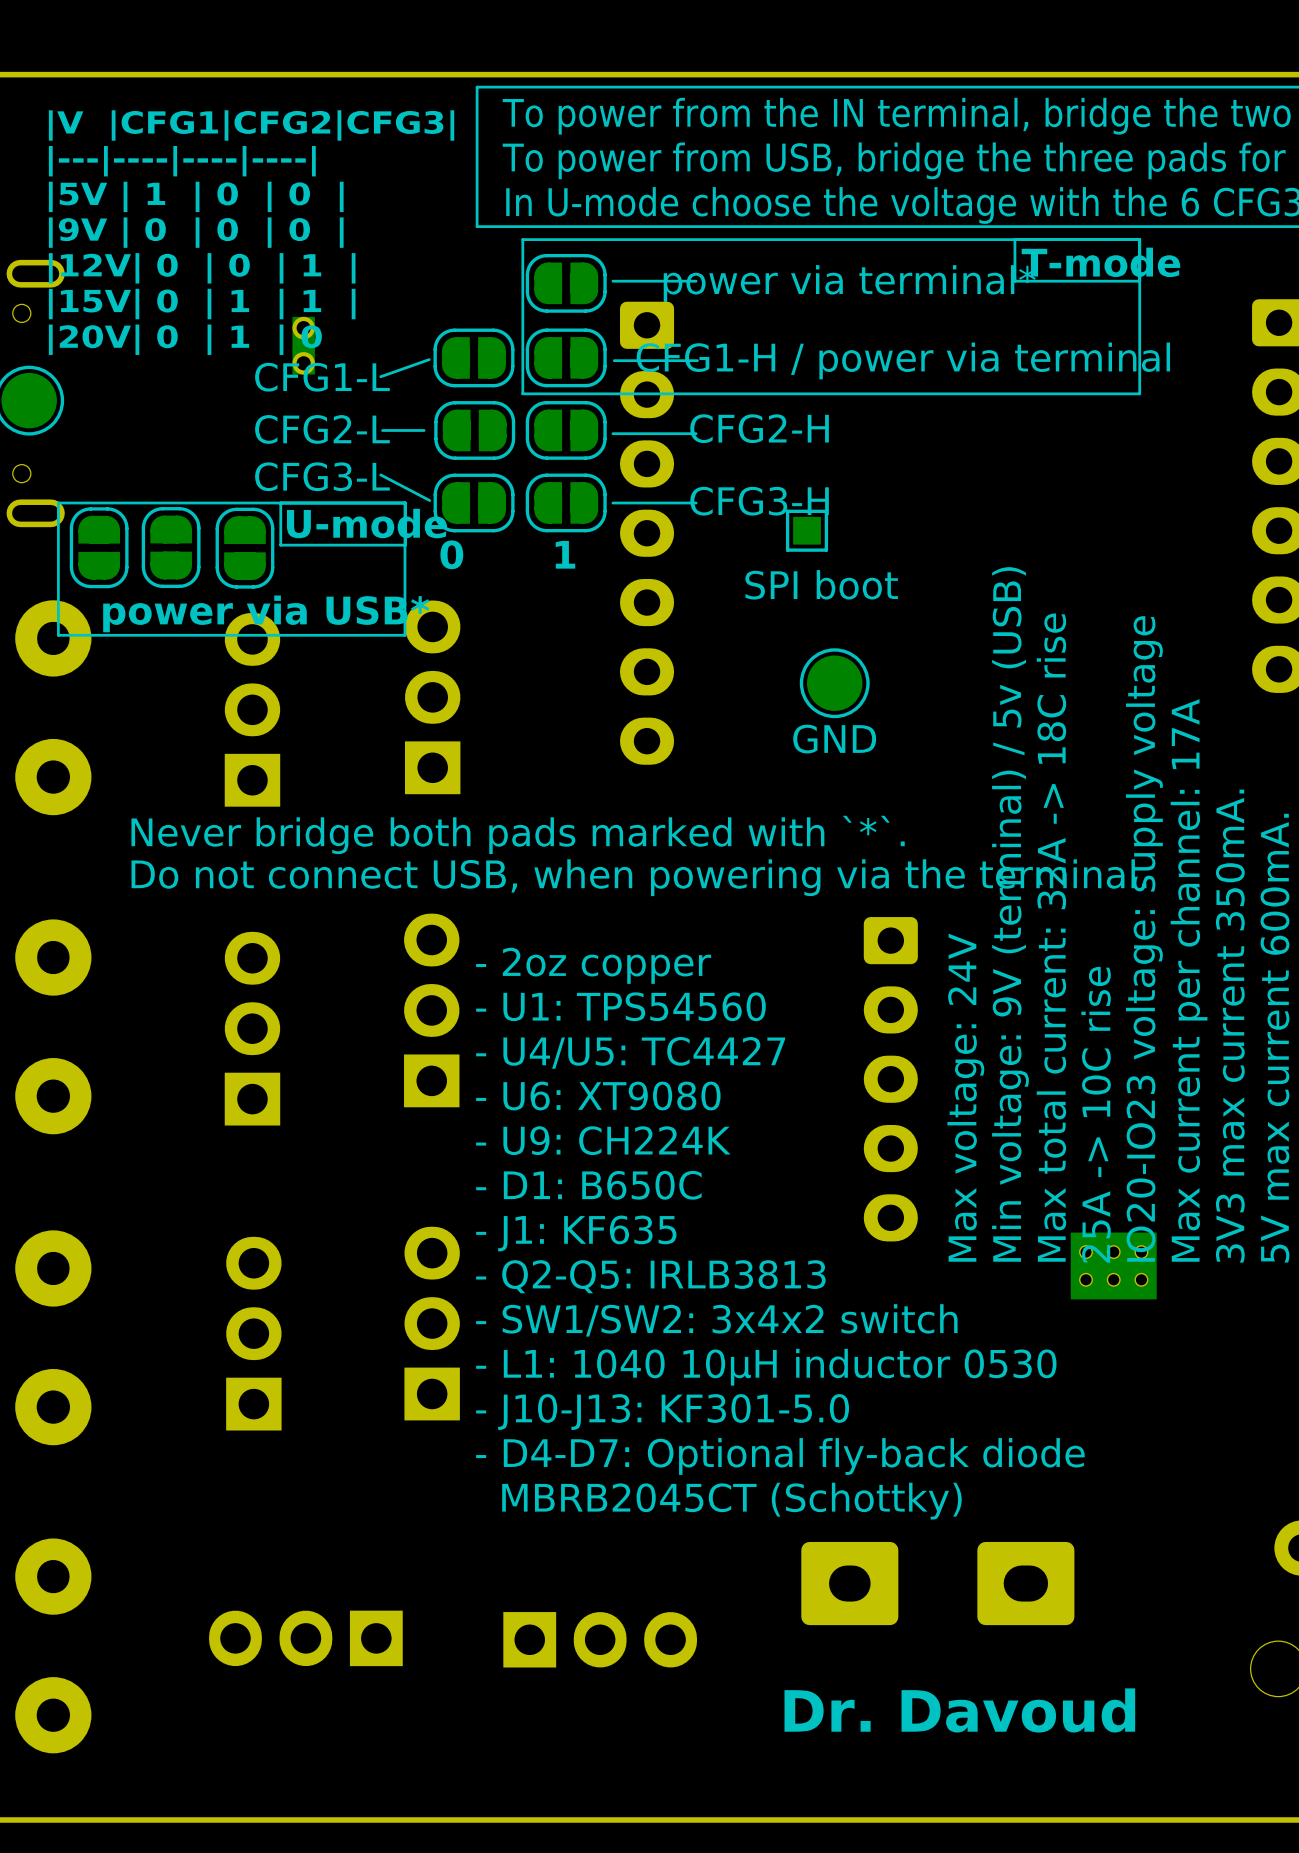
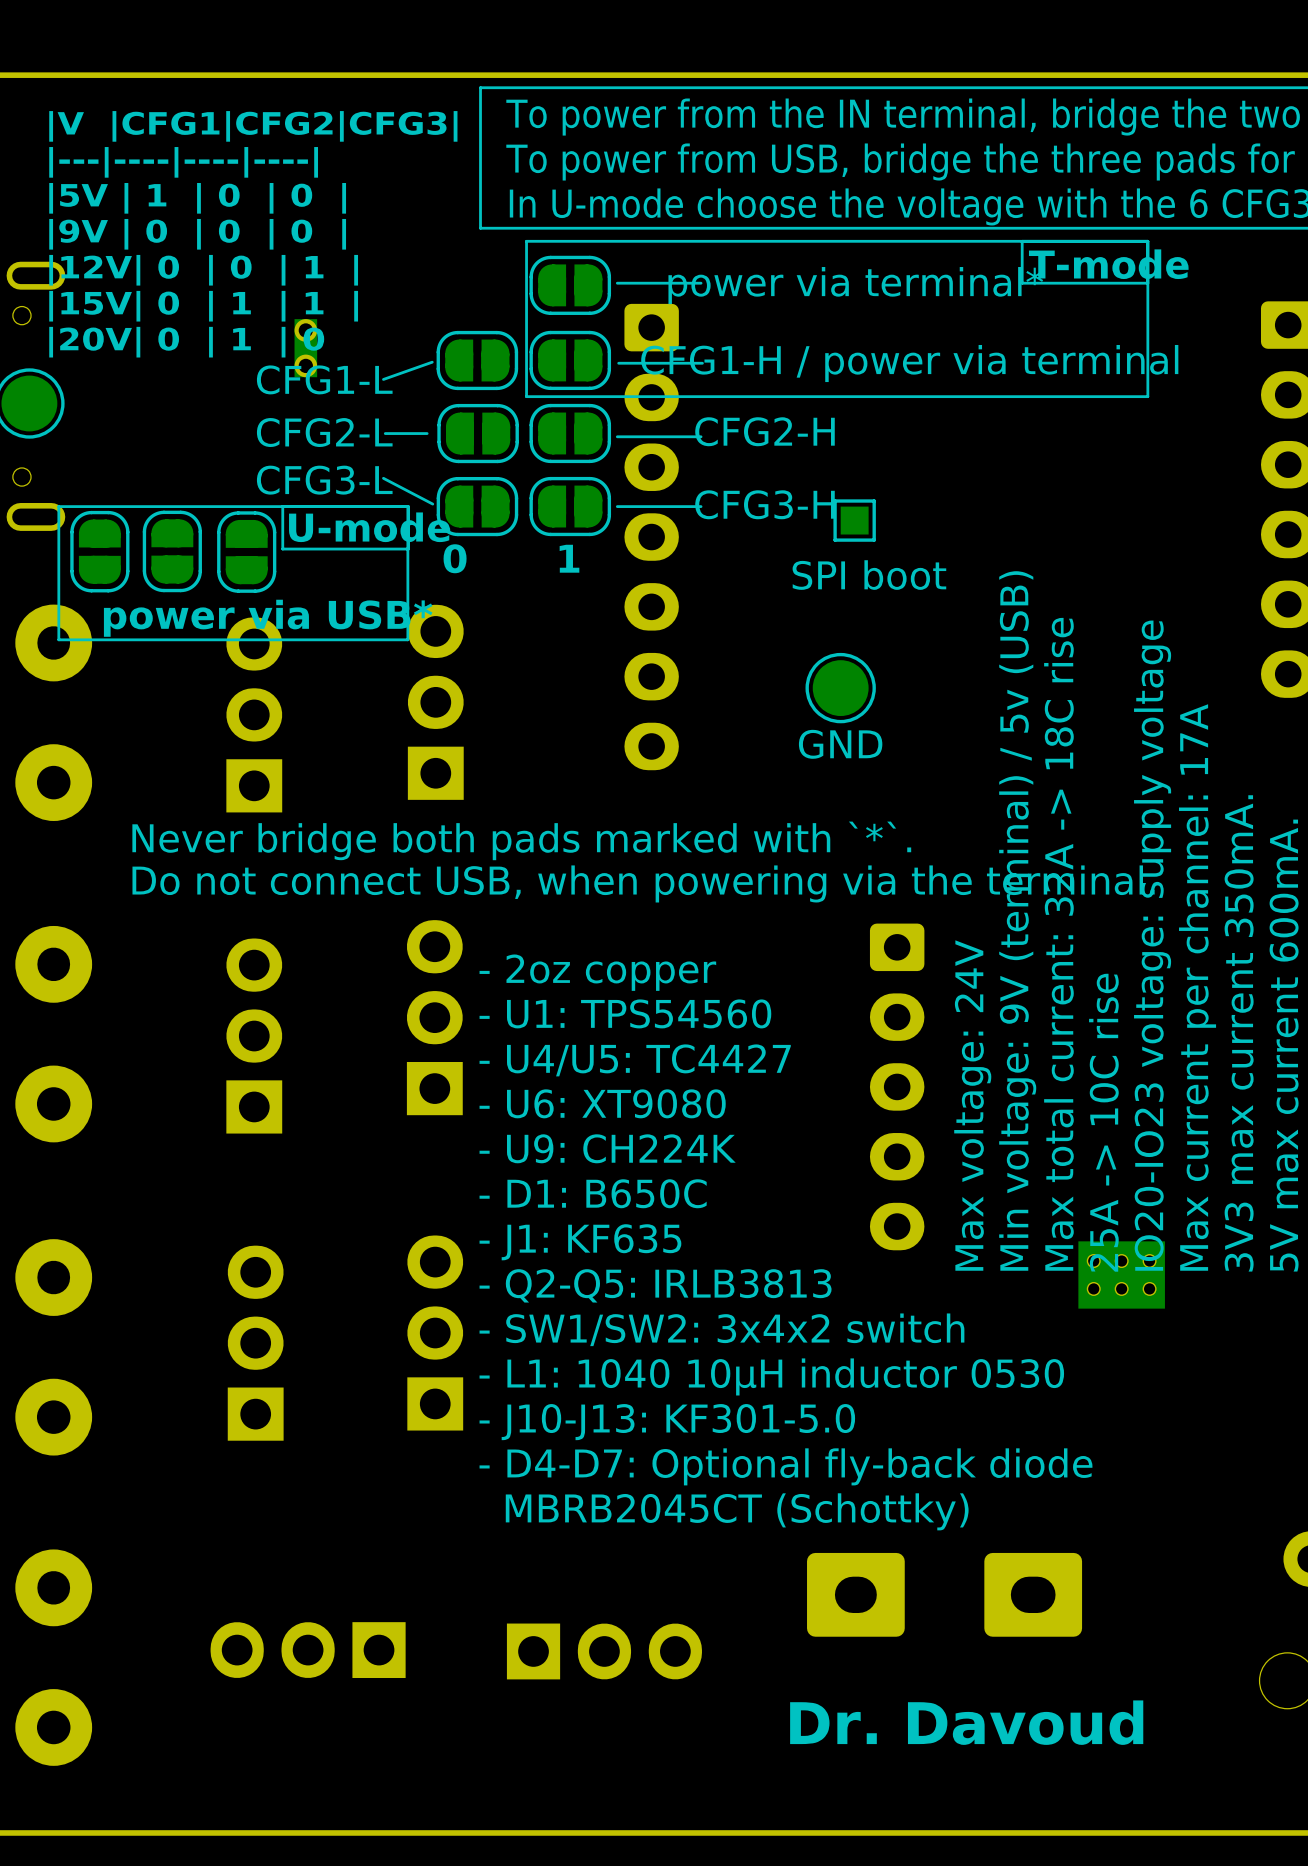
part position: (807, 530) -> (854, 520)

